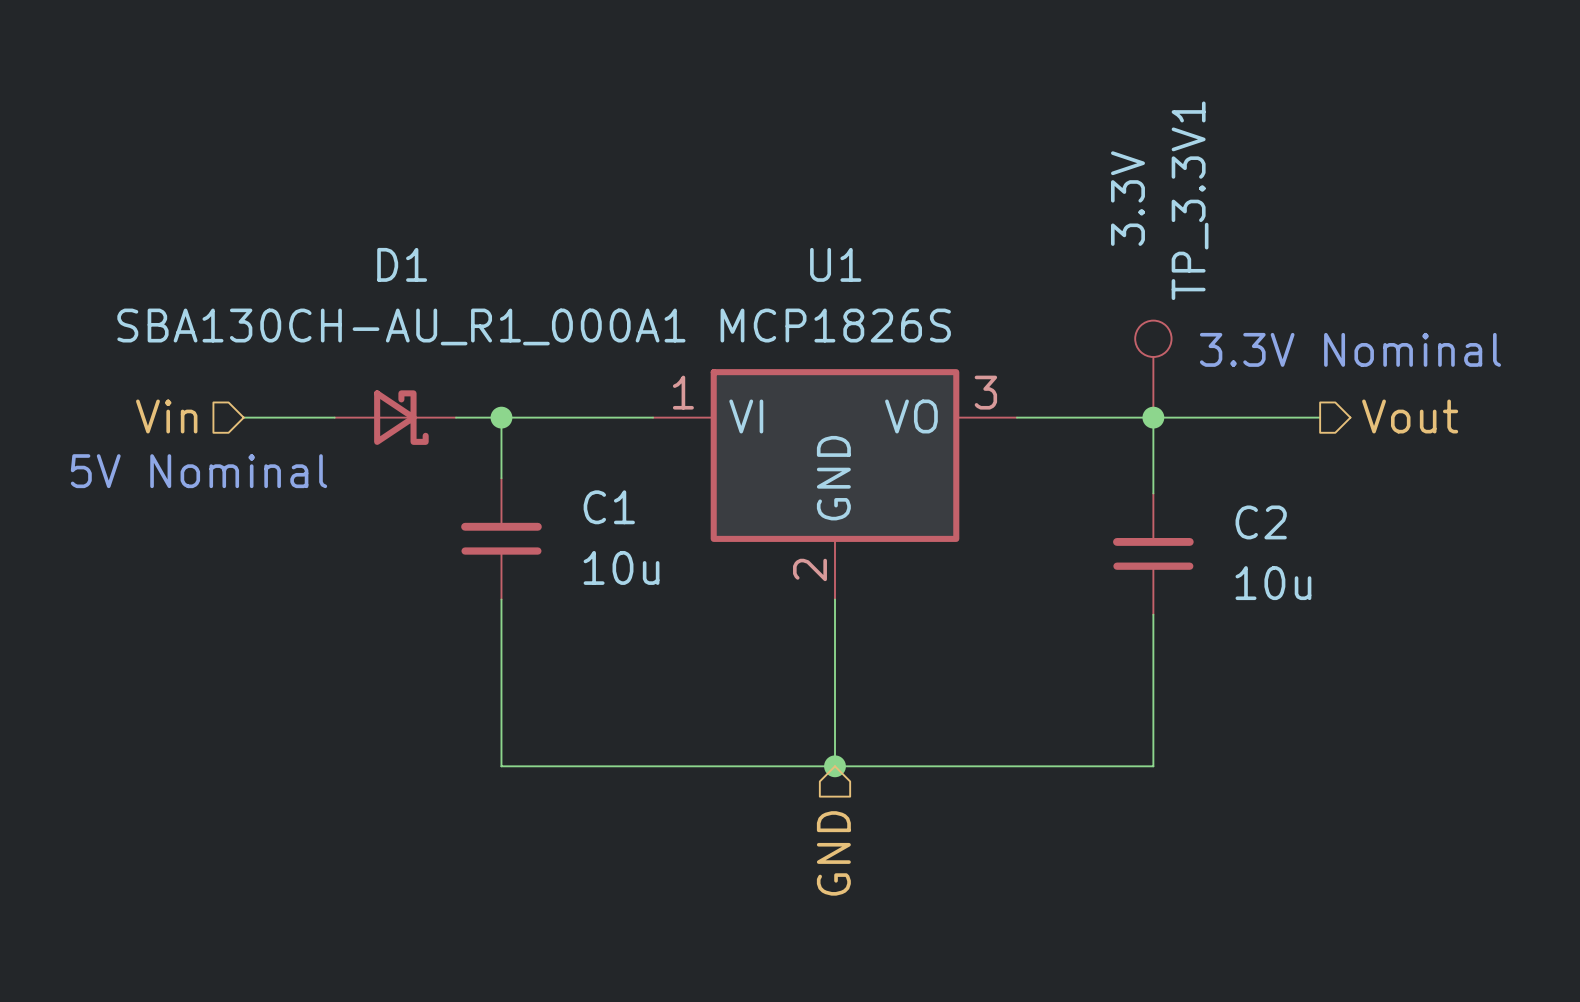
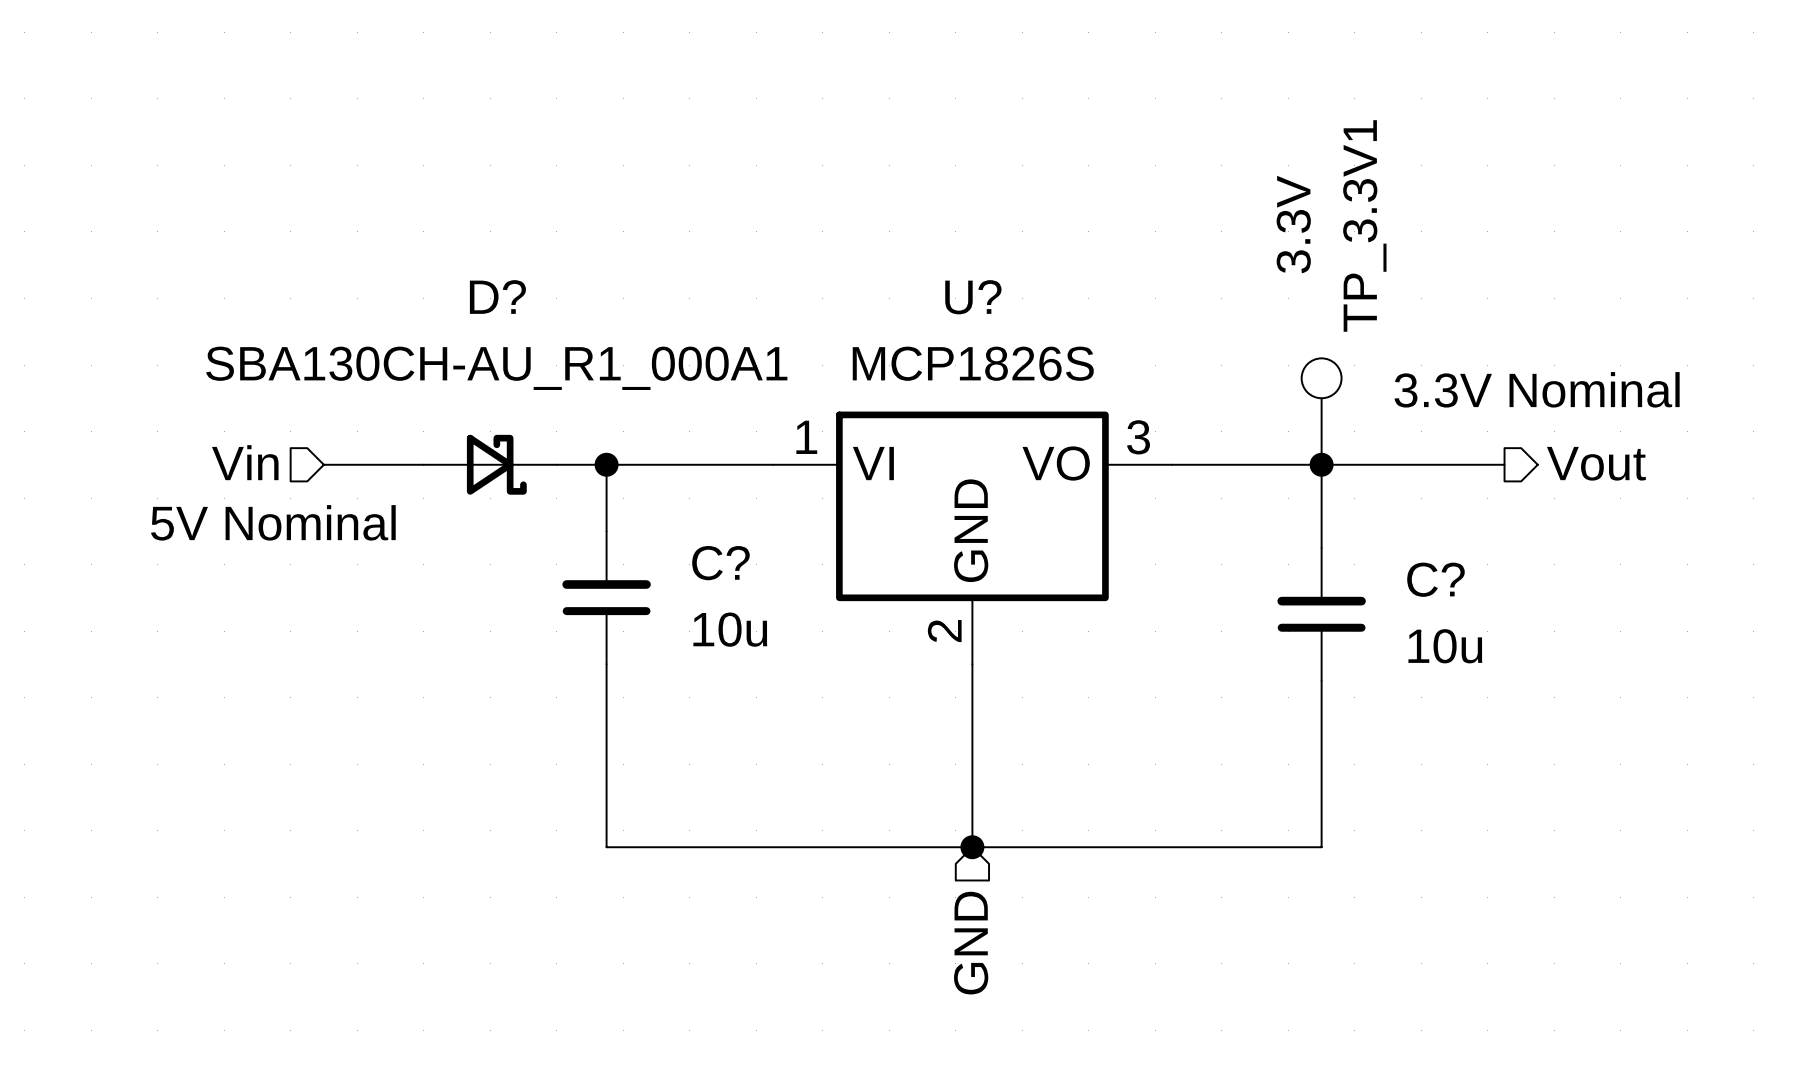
D1 name: D1 (402, 264) -> D? (497, 297)
U1 name: U1 (835, 264) -> U? (973, 297)
C1 name: C1 (609, 507) -> C? (720, 563)
C2 name: C2 (1261, 522) -> C? (1435, 579)

